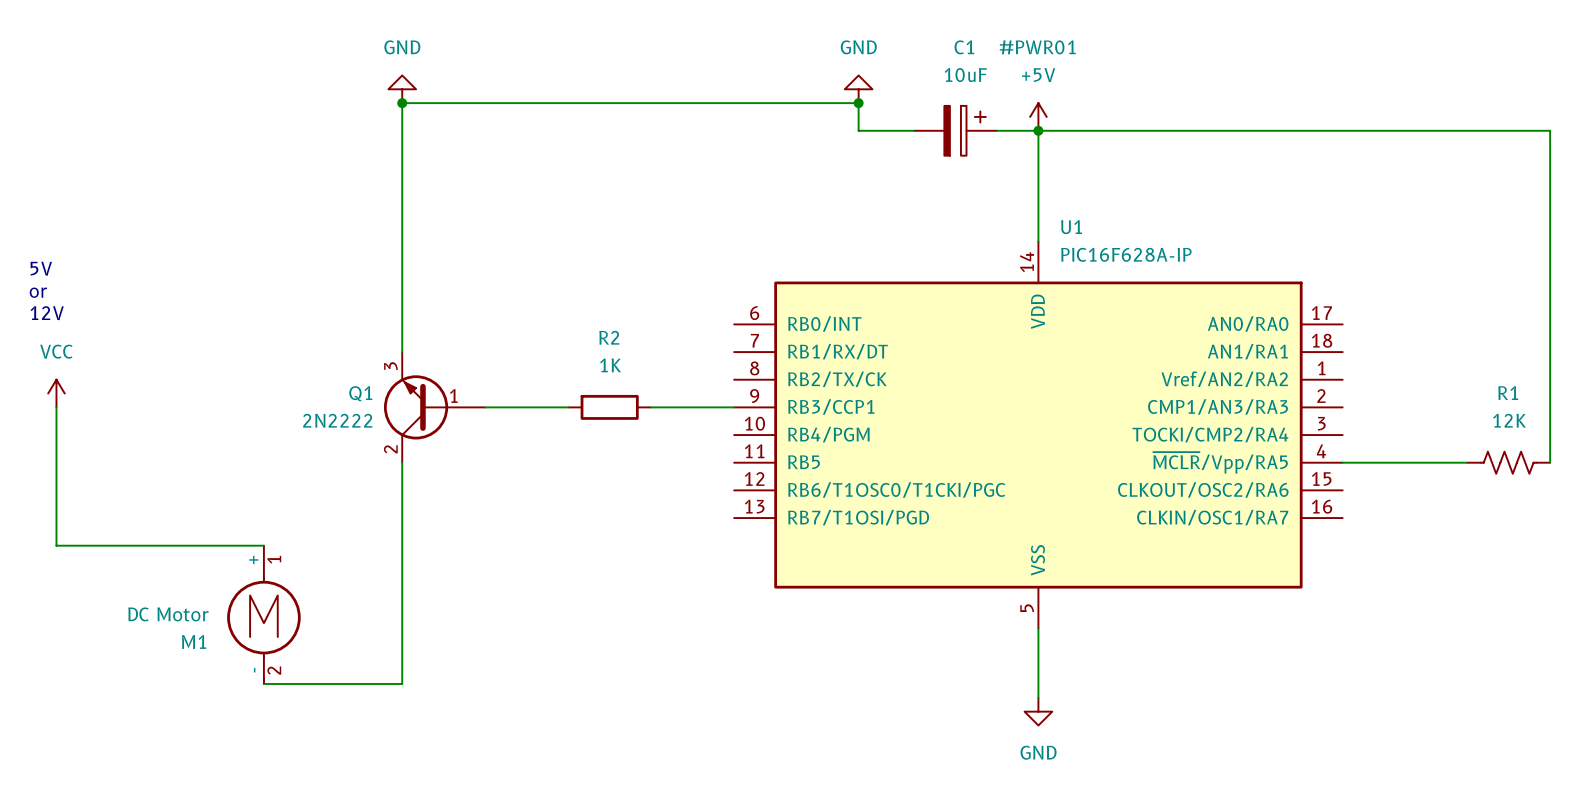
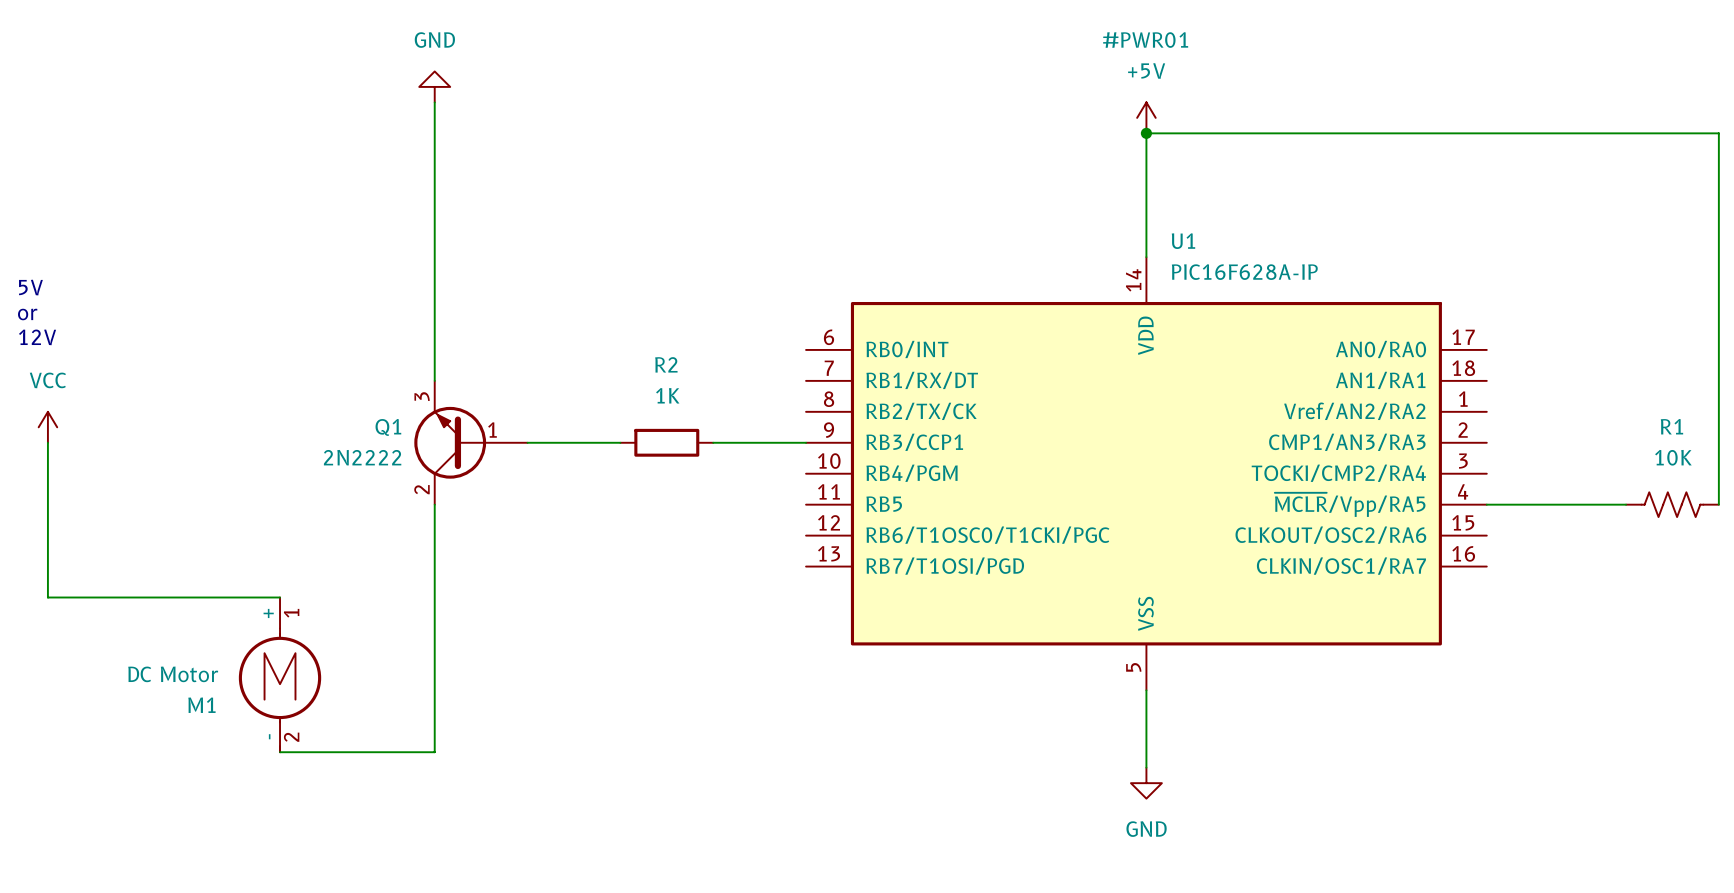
power symbol: GND (858, 89) -> none
wire: (402, 103) (858, 103) (858, 130) (913, 130) -> none
junction: (402, 103) -> none
junction: (858, 103) -> none
C1: 10uF (955, 130) -> none
wire: (996, 130) (1038, 130) -> none
R1 value: 12K (1509, 420) -> 10K (1673, 457)

